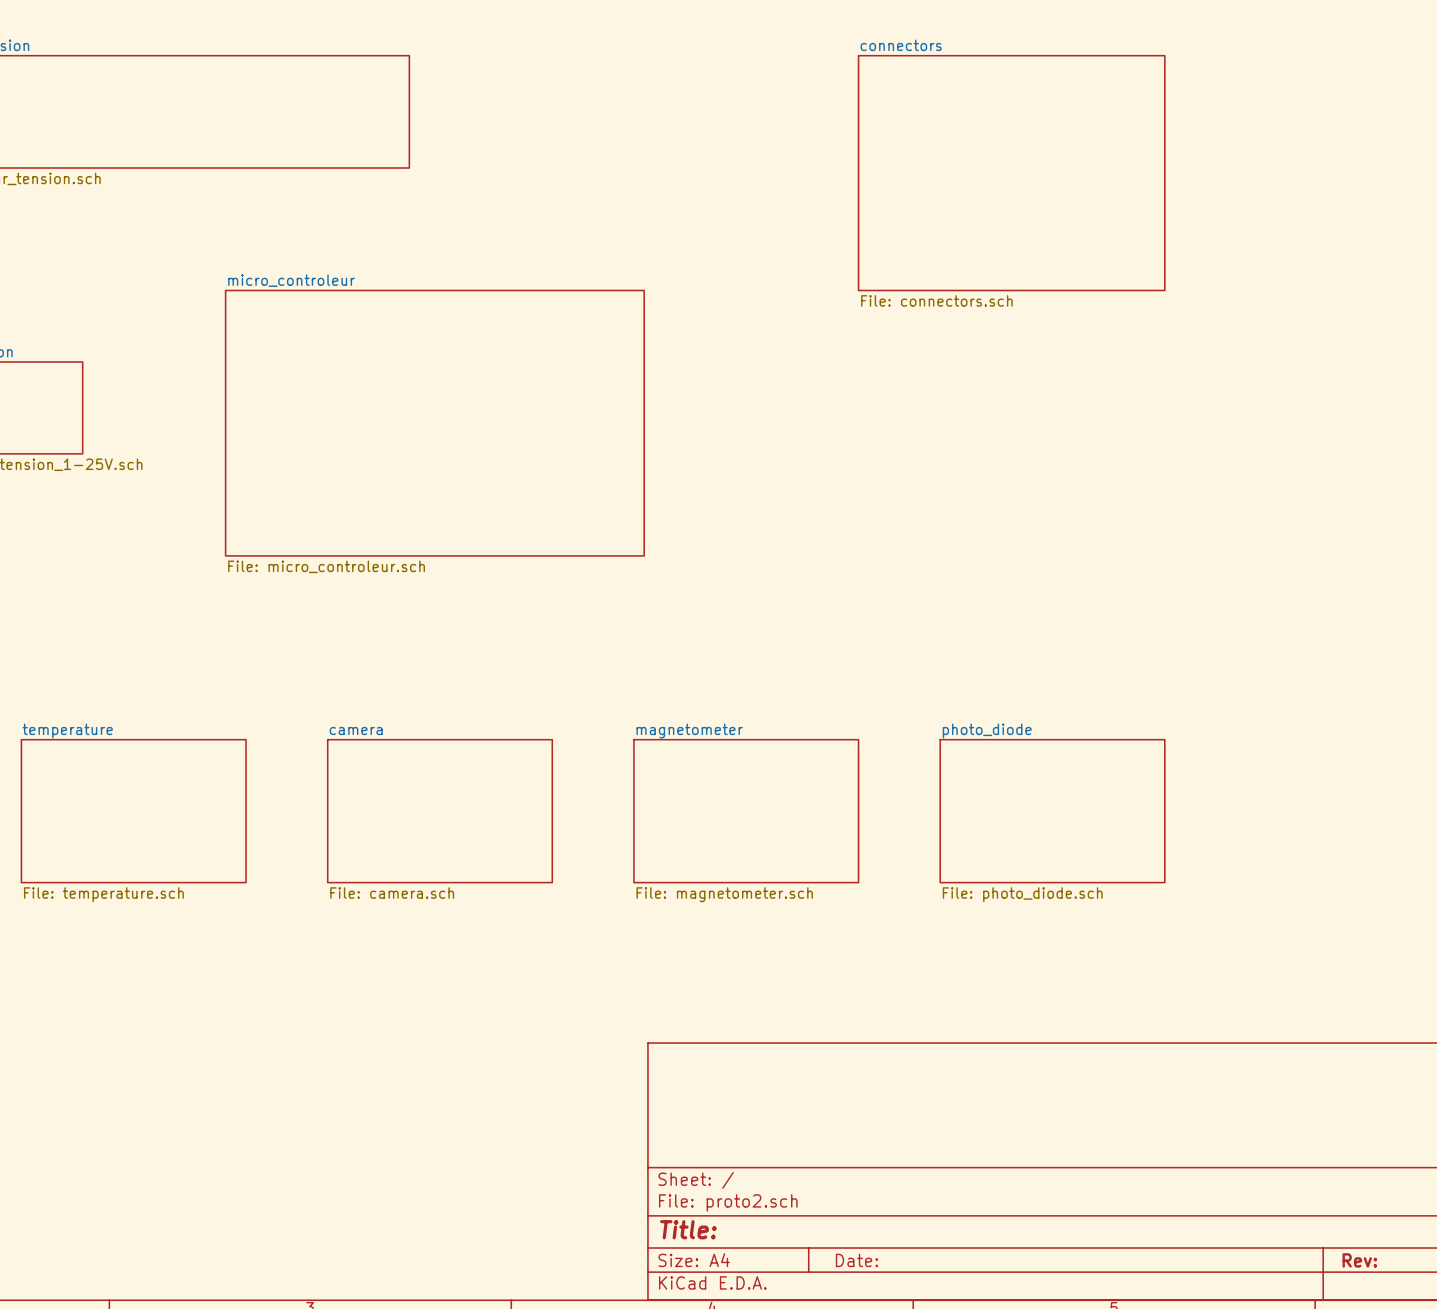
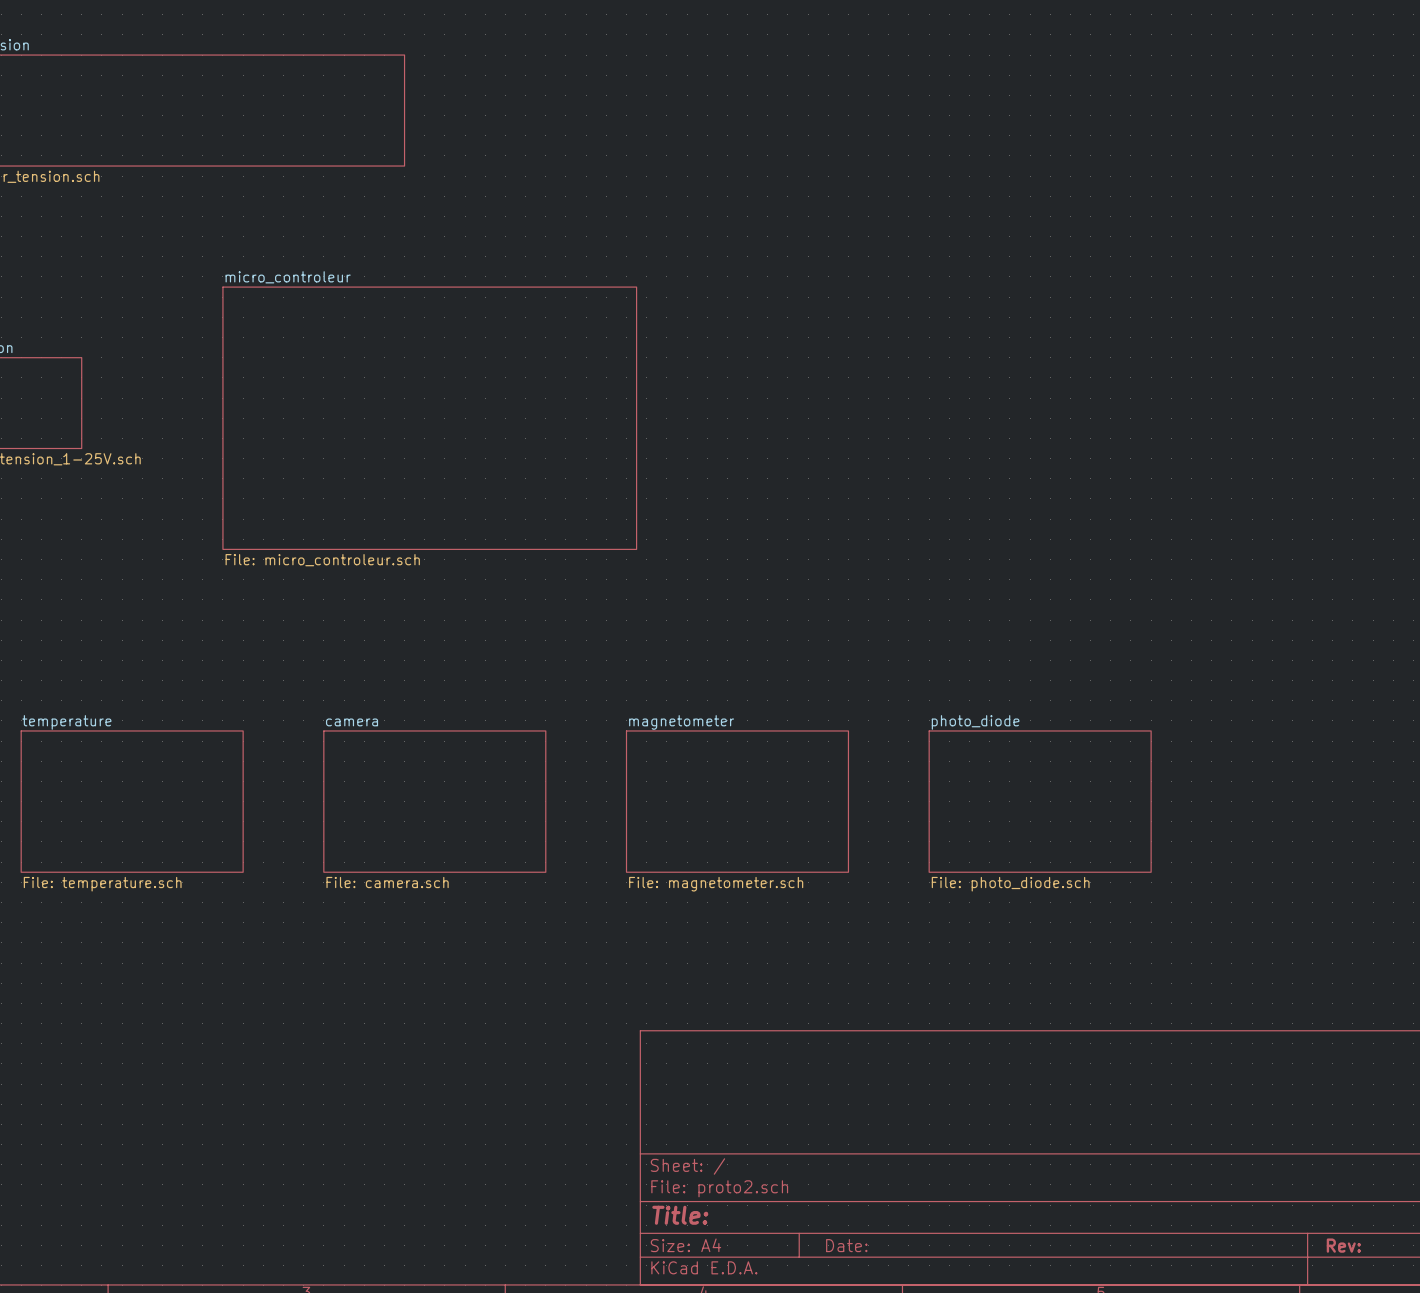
sheet connectors: File: connectors.sch (1011, 173) -> none

